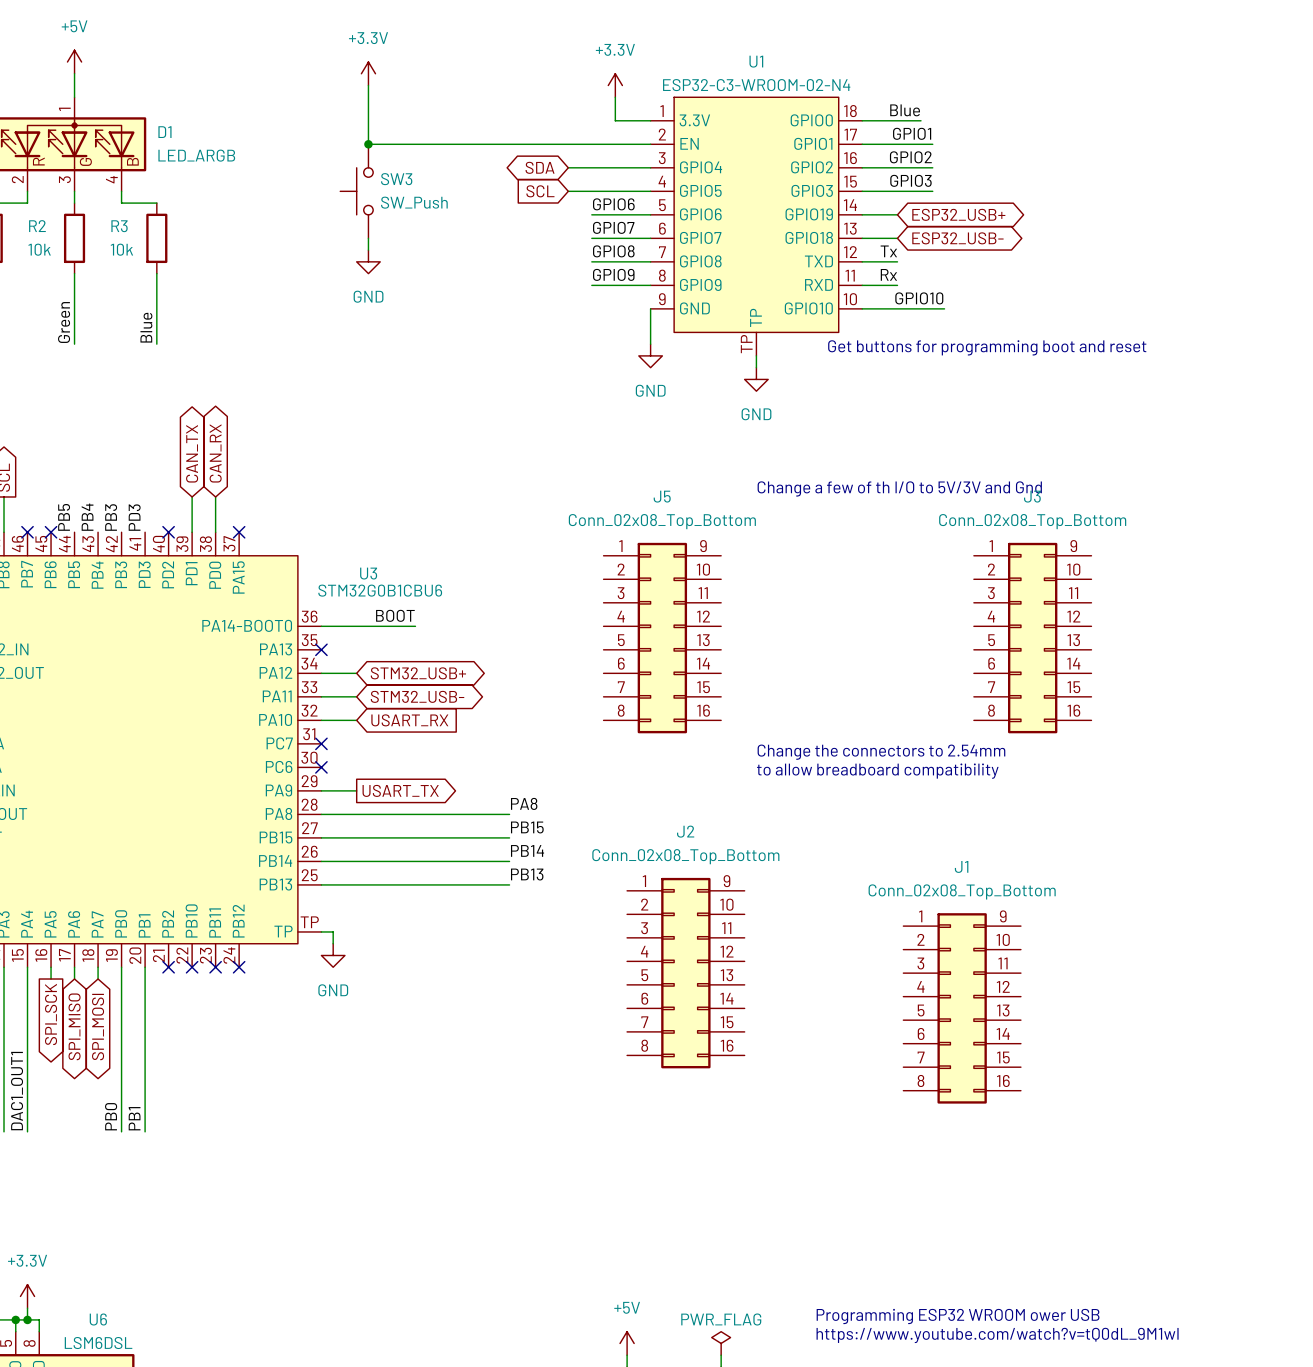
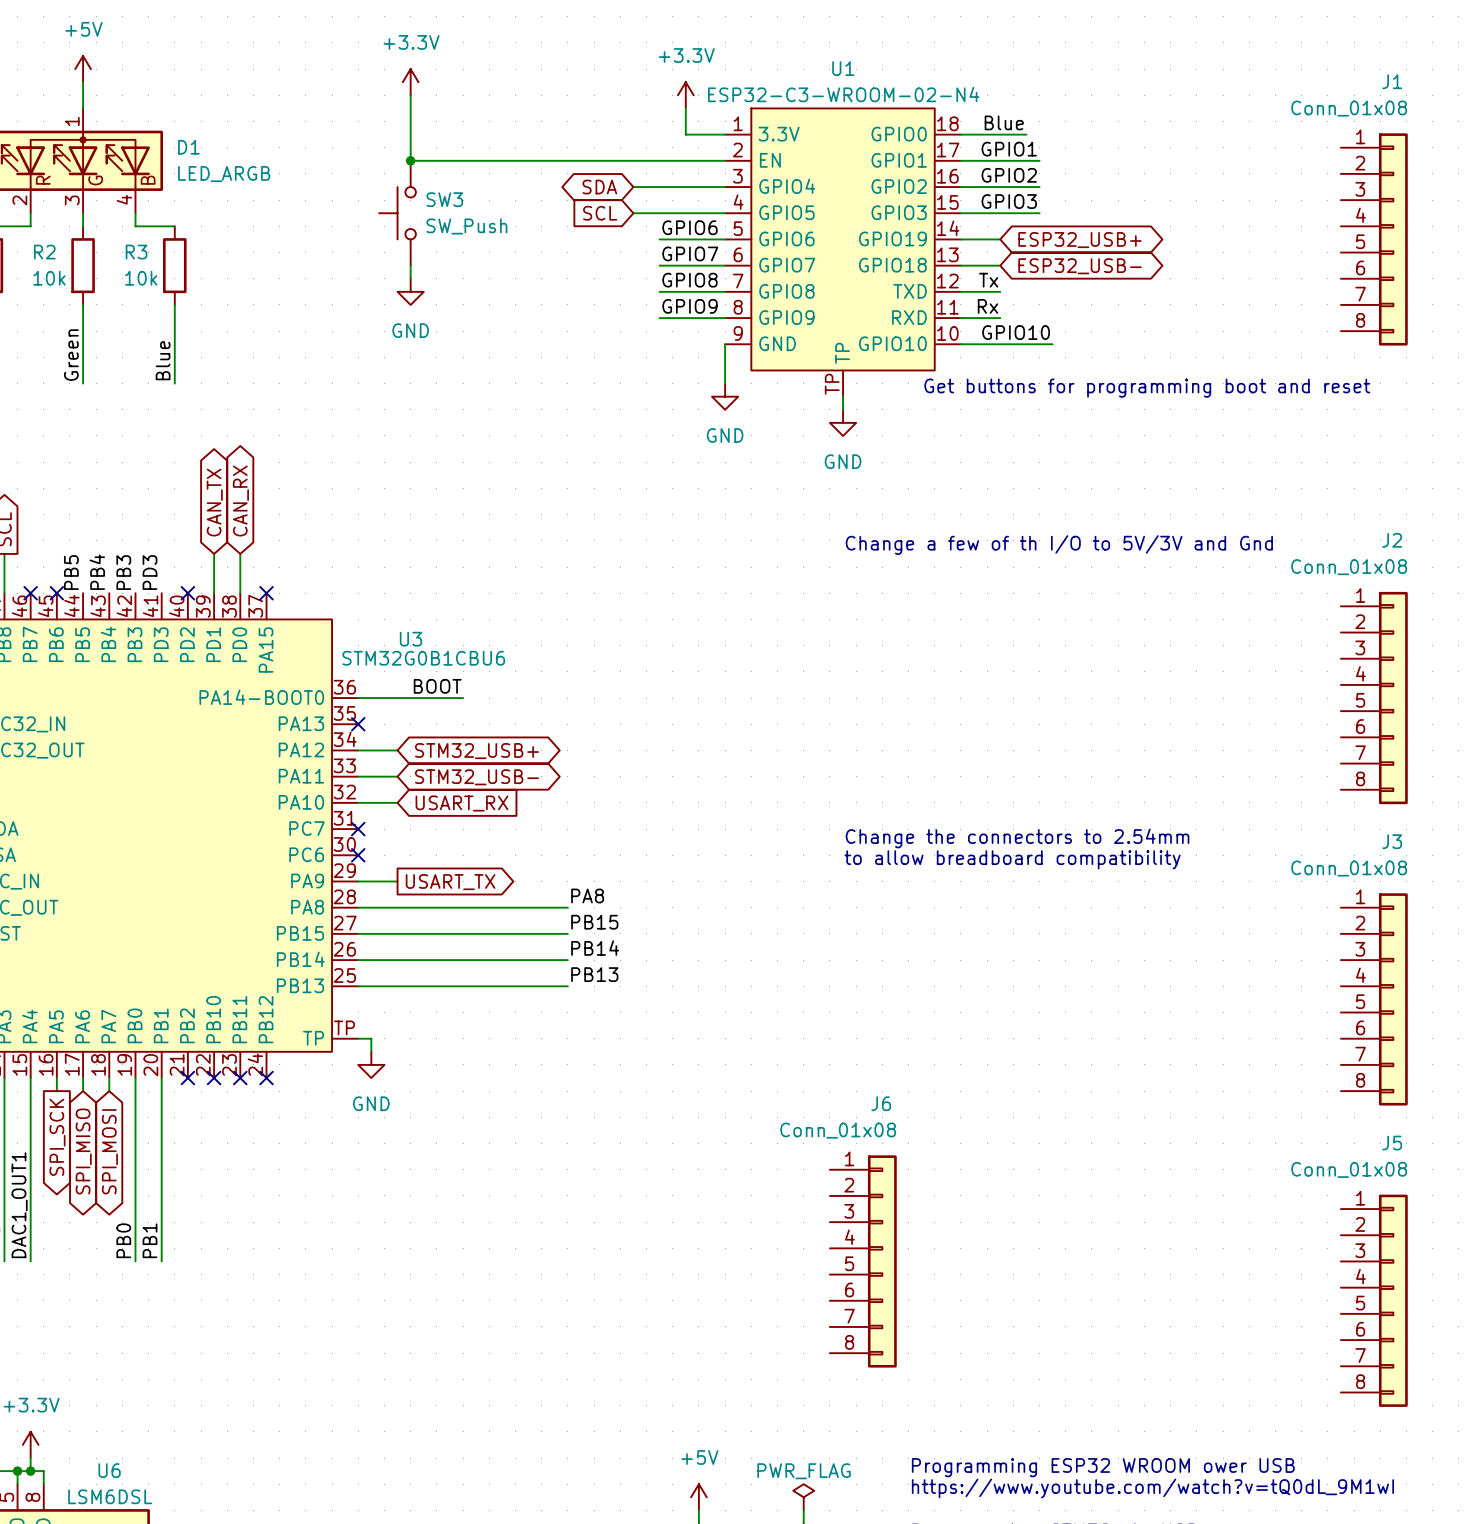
J5 name position: J5 (662, 496) -> J5 (1392, 1143)
J3 name position: J3 (1032, 496) -> J3 (1392, 841)
J5 value: Conn_02x08_Top_Bottom (662, 521) -> Conn_01x08 (1349, 1169)
J3 value: Conn_02x08_Top_Bottom (1032, 521) -> Conn_01x08 (1349, 868)
J5 symbol: [603, 542, 722, 734] -> [1340, 1194, 1408, 1407]
J3 symbol: [973, 542, 1092, 734] -> [1340, 893, 1408, 1106]
J2 name position: J2 (685, 831) -> J2 (1392, 540)
J2 value: Conn_02x08_Top_Bottom (685, 856) -> Conn_01x08 (1349, 567)
J1 name position: J1 (961, 866) -> J1 (1392, 81)
J2 symbol: [627, 877, 745, 1069] -> [1340, 591, 1408, 805]
J1 value: Conn_02x08_Top_Bottom (962, 891) -> Conn_01x08 (1349, 108)
J1 symbol: [903, 913, 1021, 1104] -> [1340, 133, 1408, 346]
J6: none -> Conn_01x08 (863, 1261)

